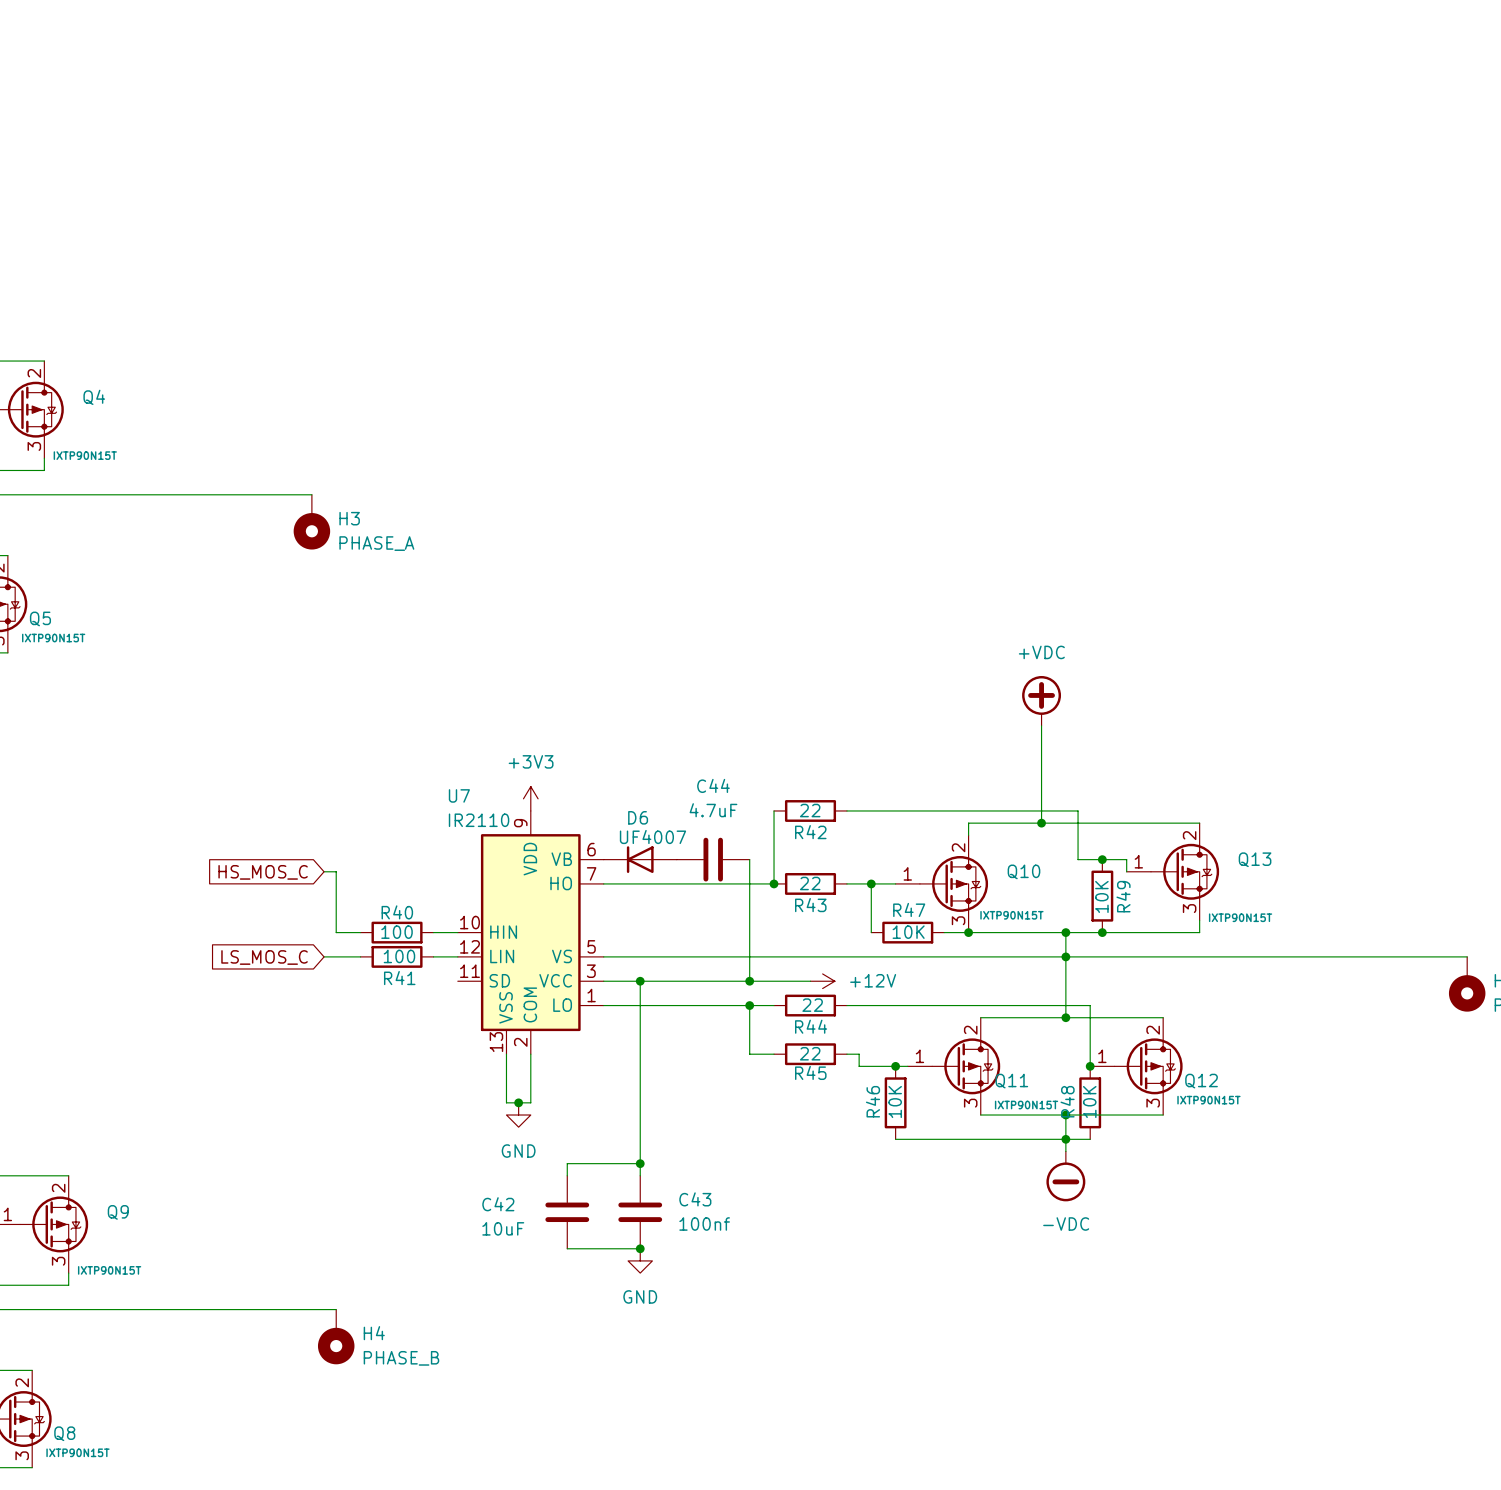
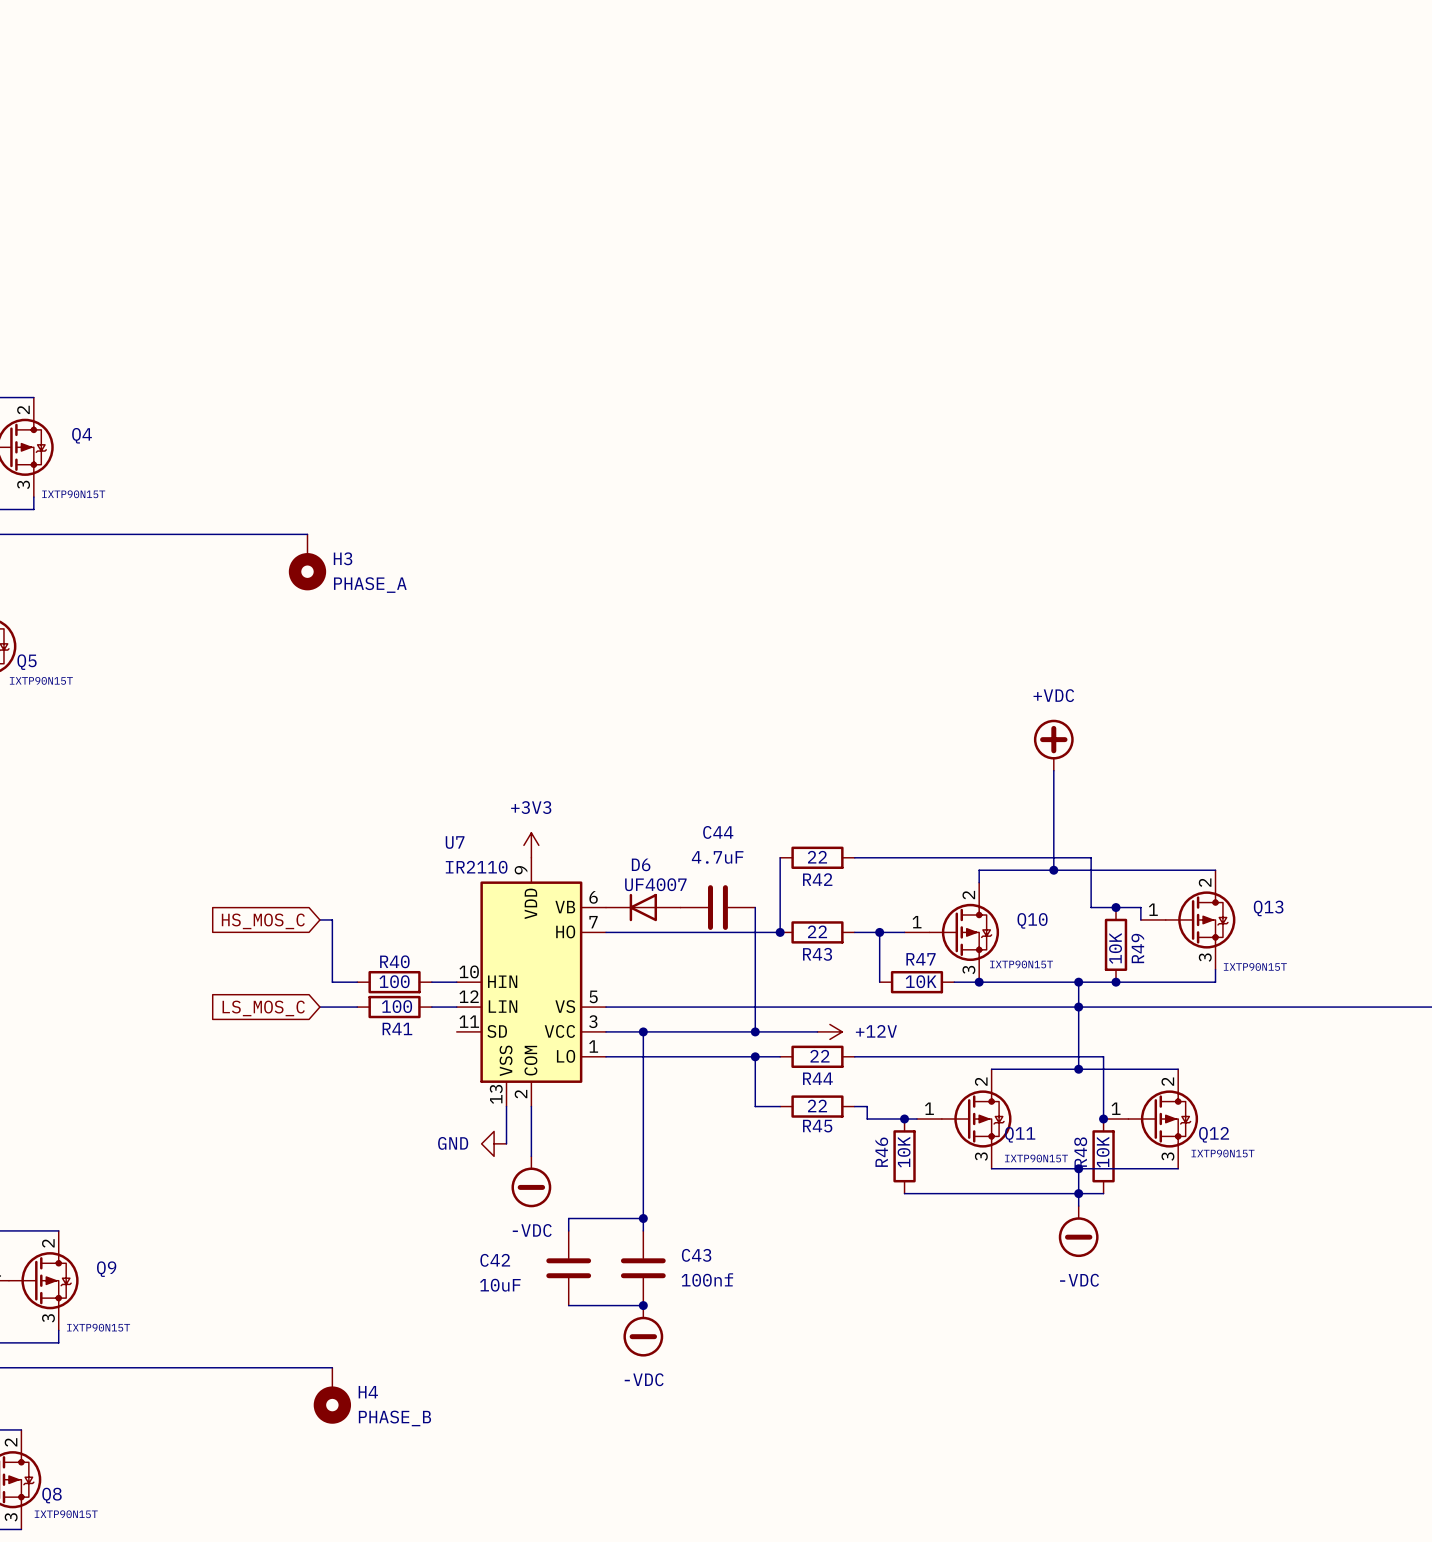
wire: (506, 1090) (506, 1102) (530, 1102) -> none
junction: (518, 1102) -> none
power symbol rotation: 0° (518, 1115) -> 90° clockwise (494, 1143)
power symbol position: GND (518, 1115) -> GND (494, 1143)
power symbol: none -> -VDC (531, 1181)
power symbol: GND (640, 1260) -> none
power symbol: none -> -VDC (643, 1331)

